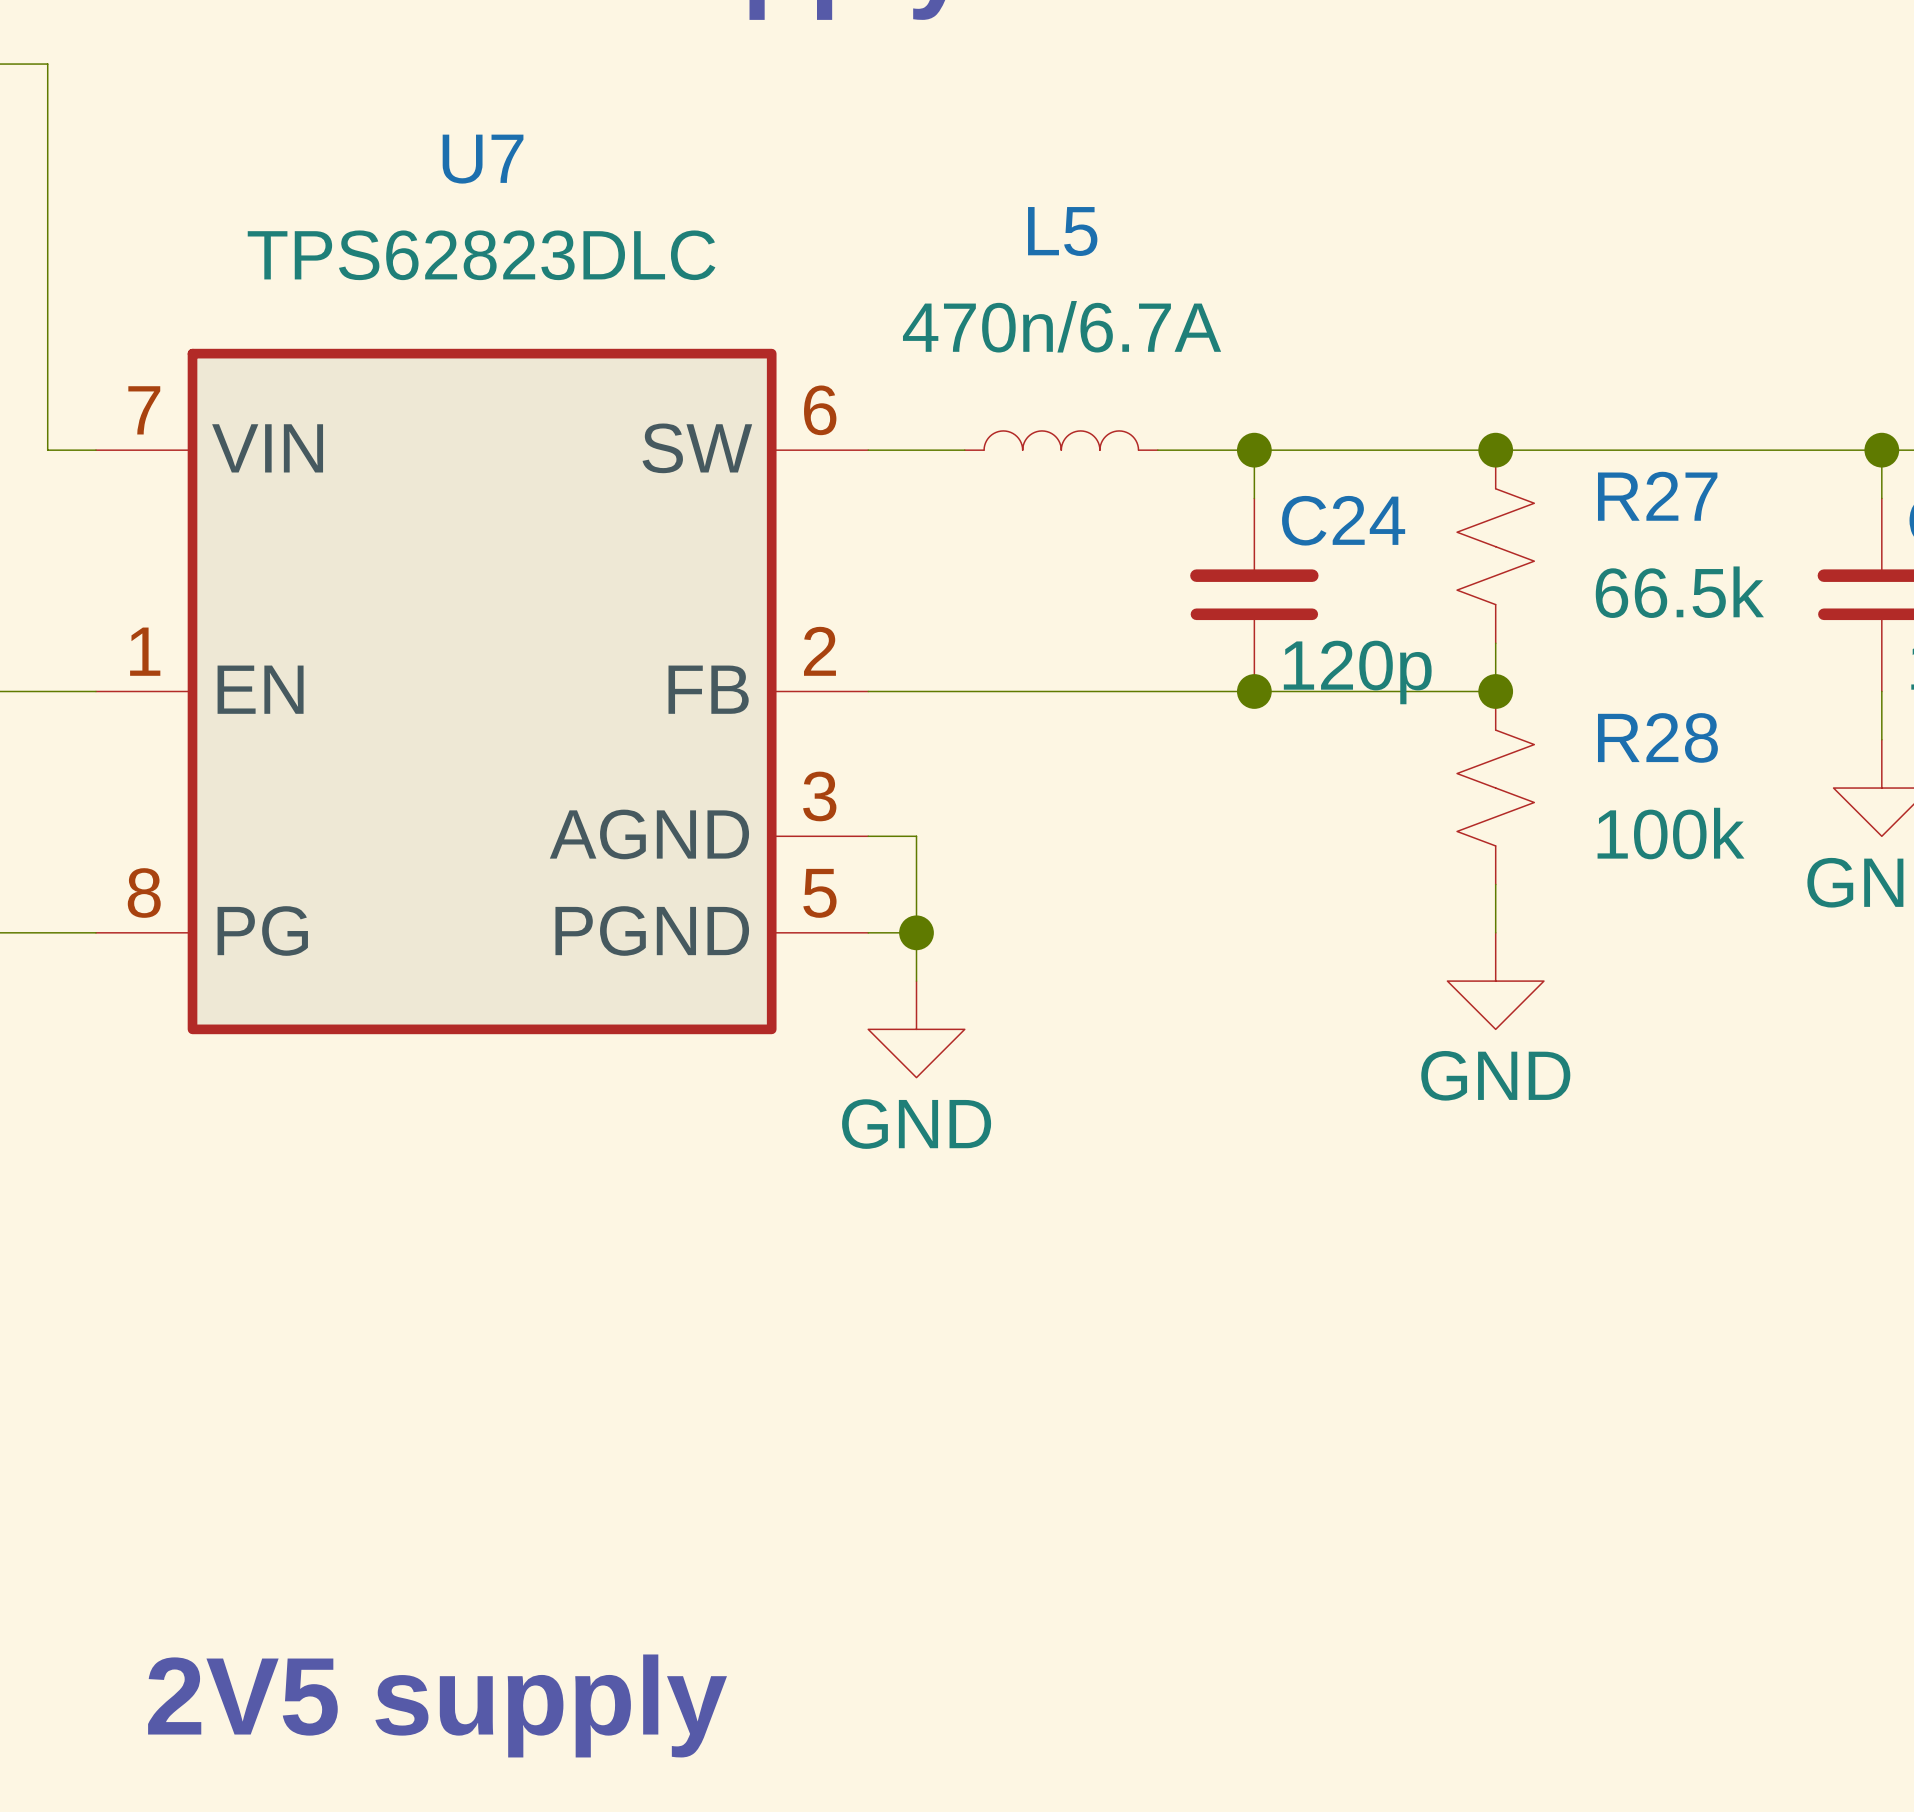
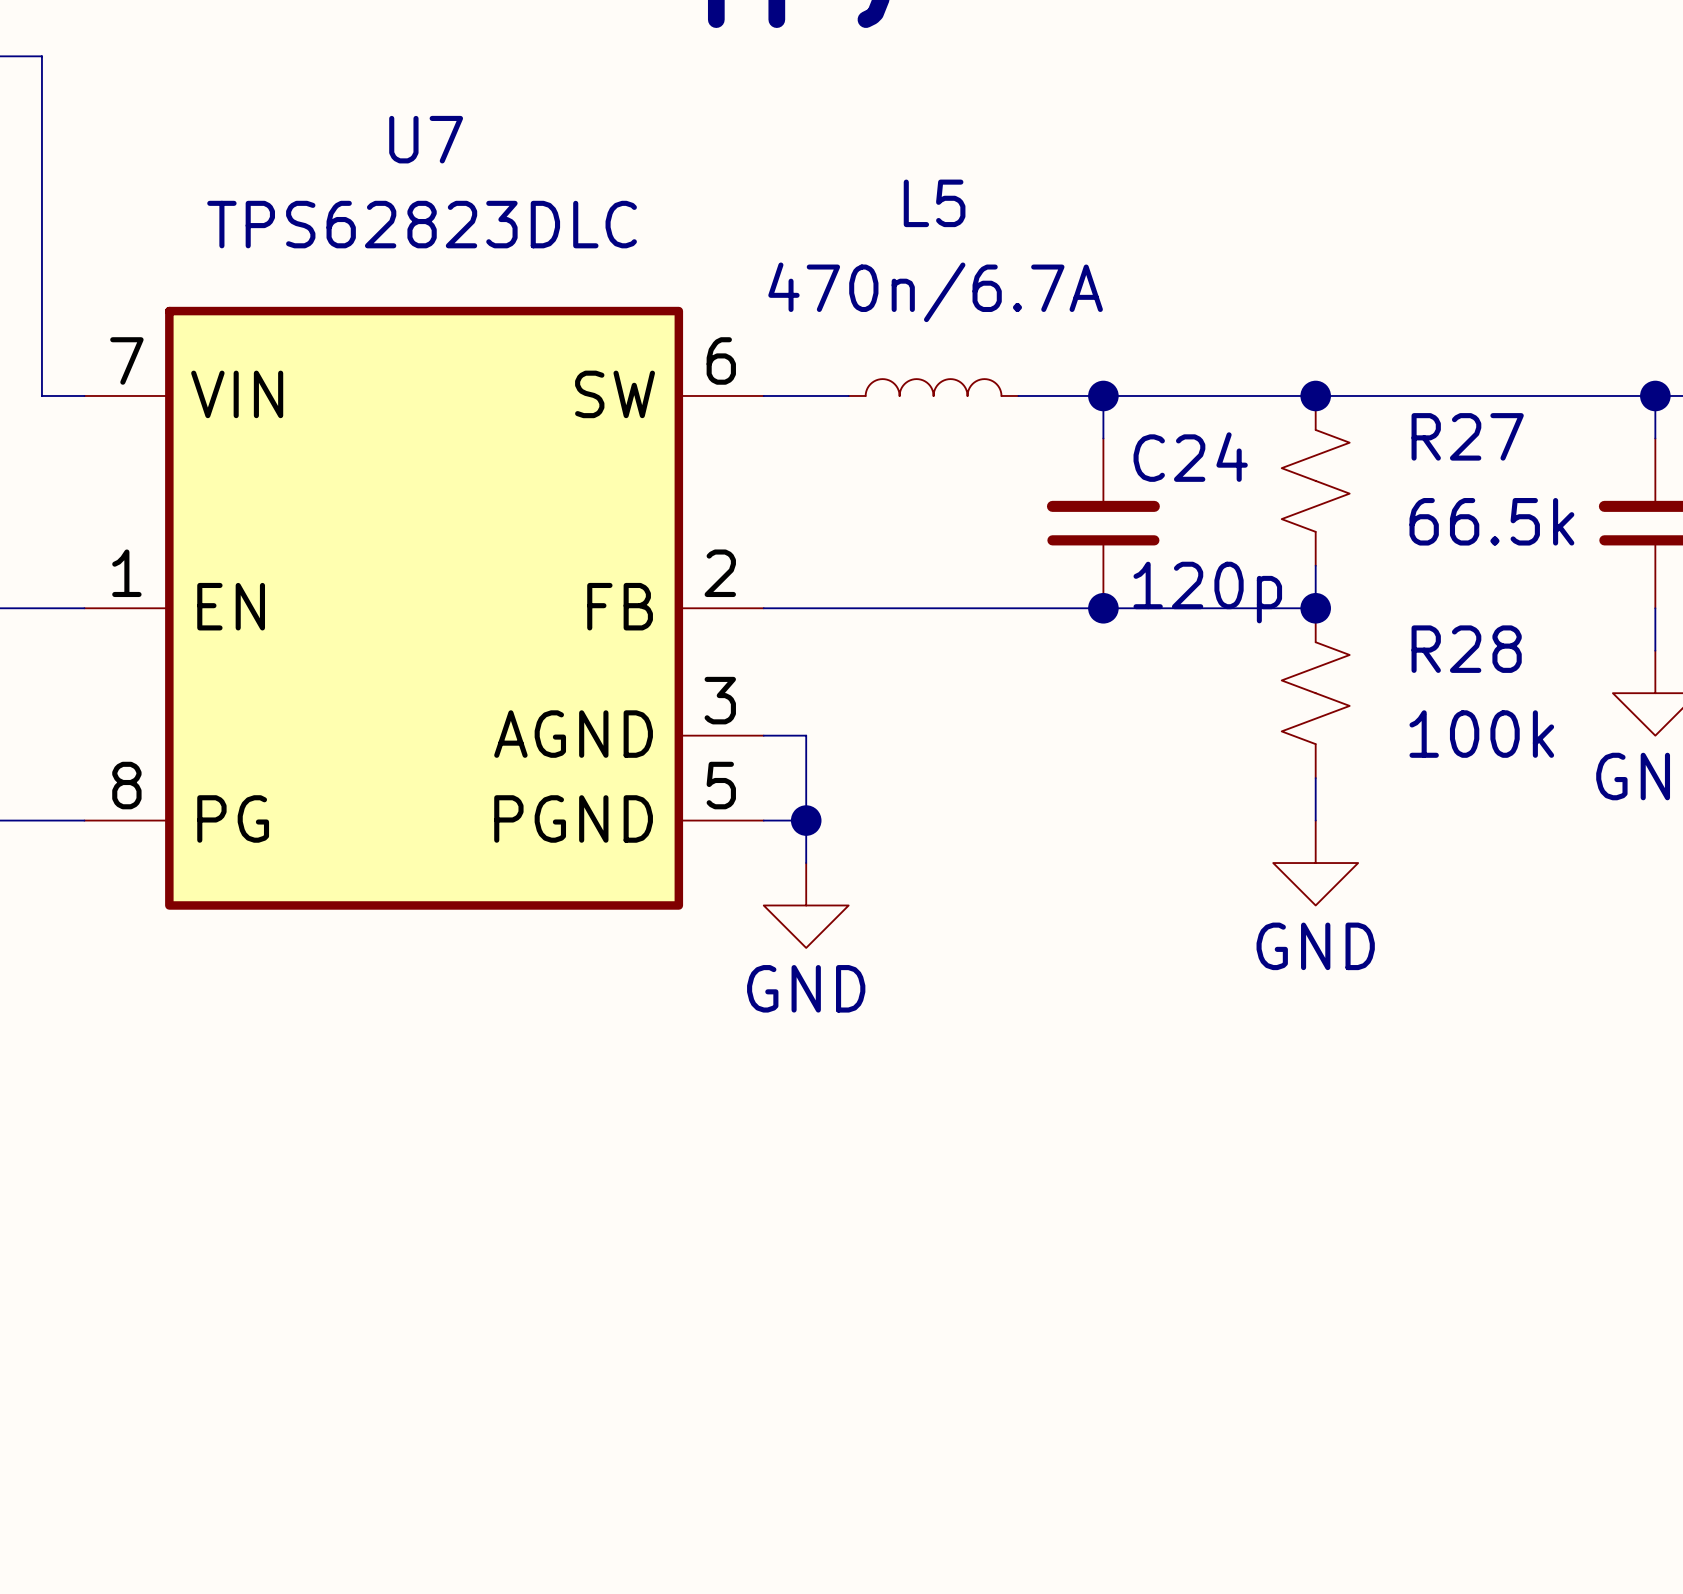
text: 2V5 supply (437, 1705) -> none

